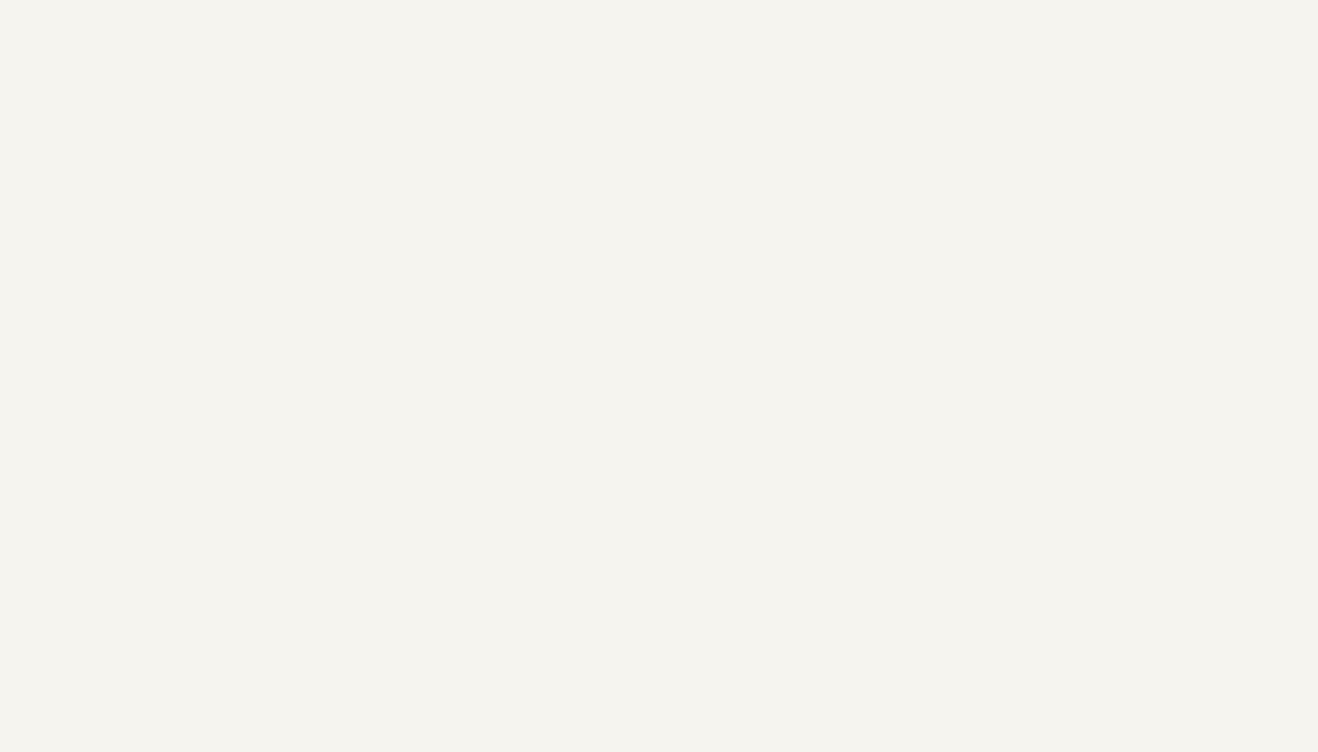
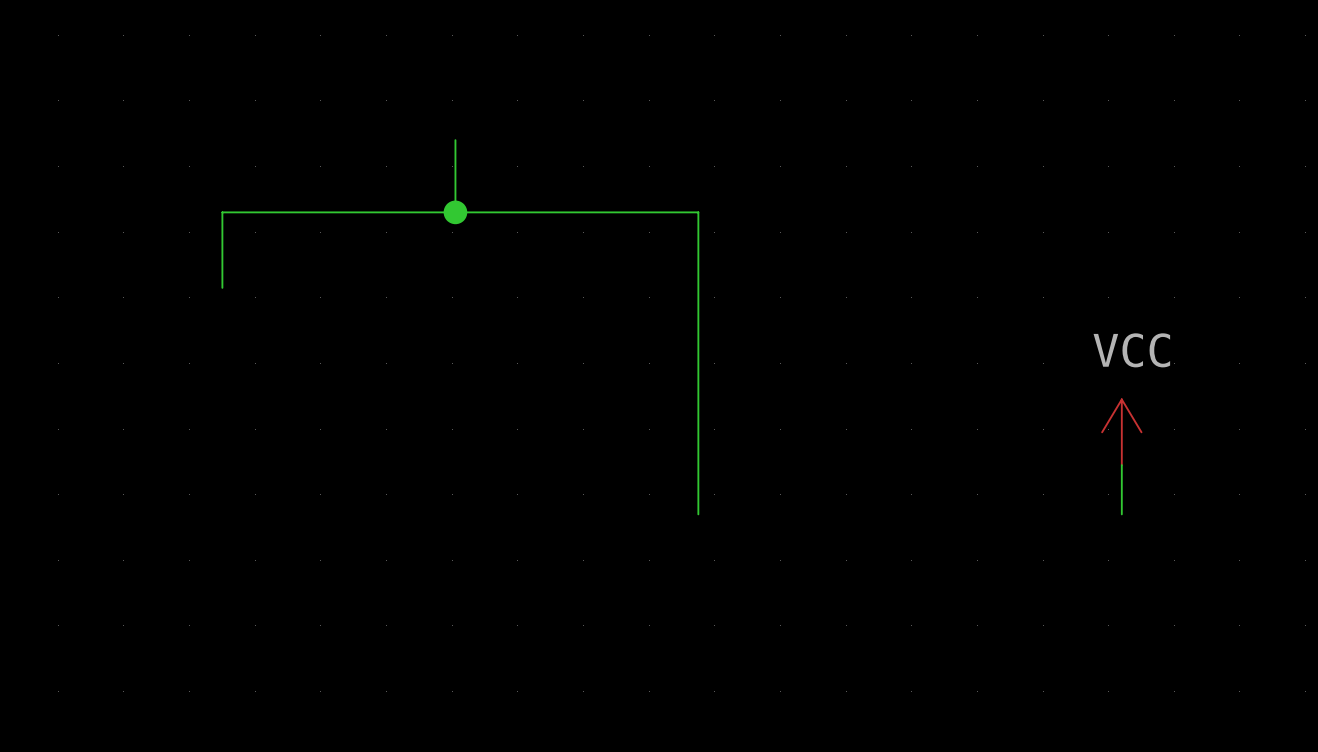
wire: none -> (455, 140) (455, 212)
junction: none -> (455, 212)
wire: none -> (222, 287) (222, 212) (698, 212) (698, 514)
power symbol: none -> VCC (1121, 432)
wire: none -> (1121, 465) (1121, 514)

